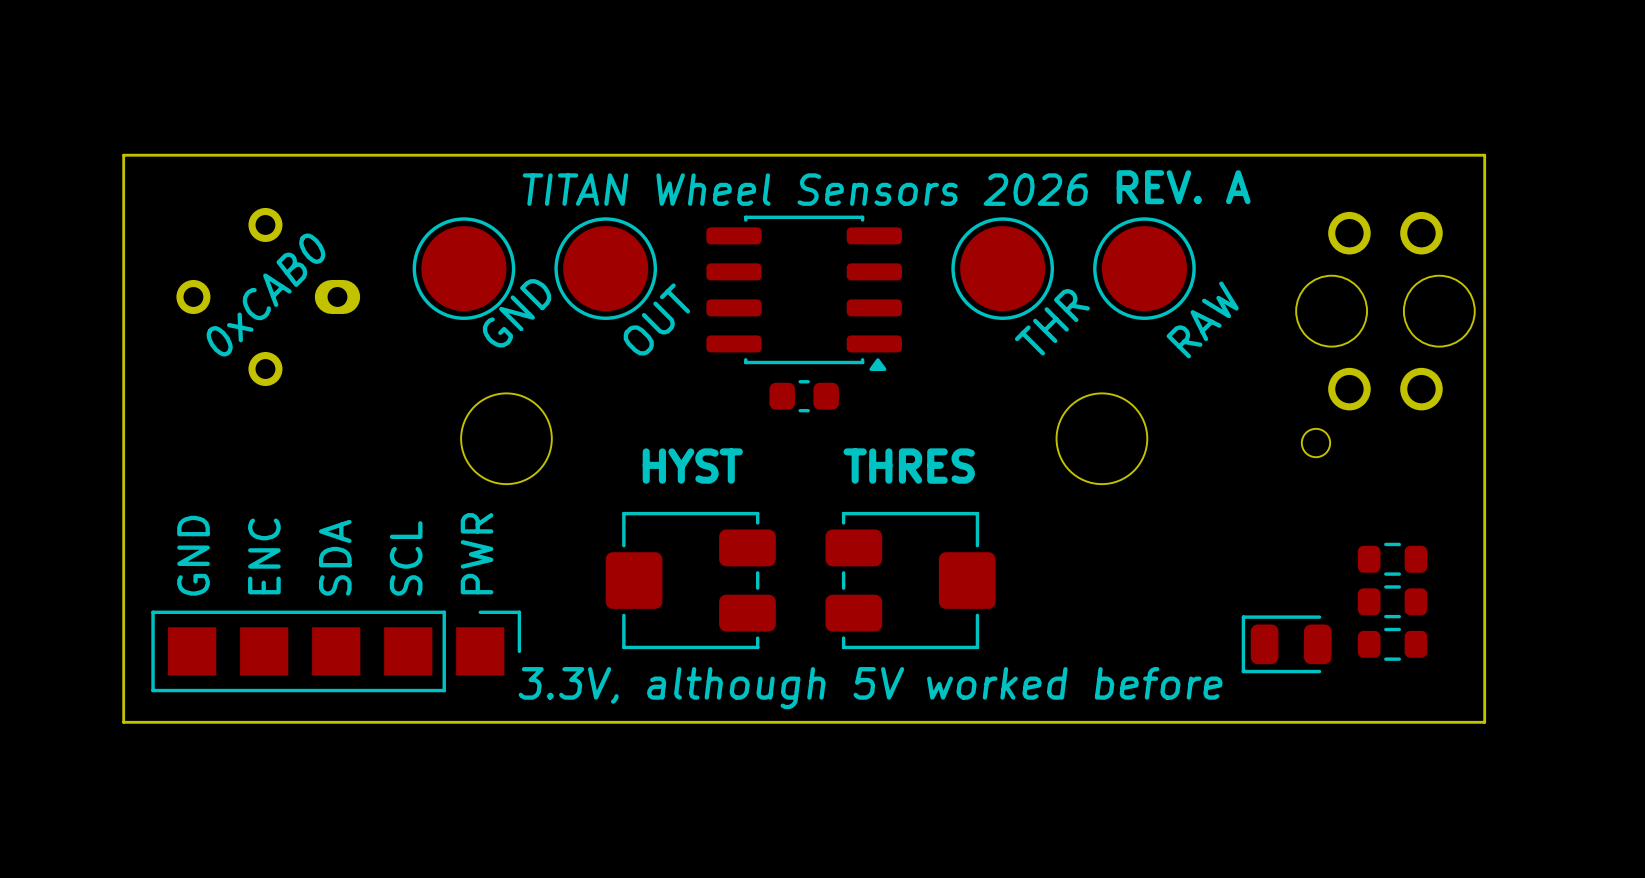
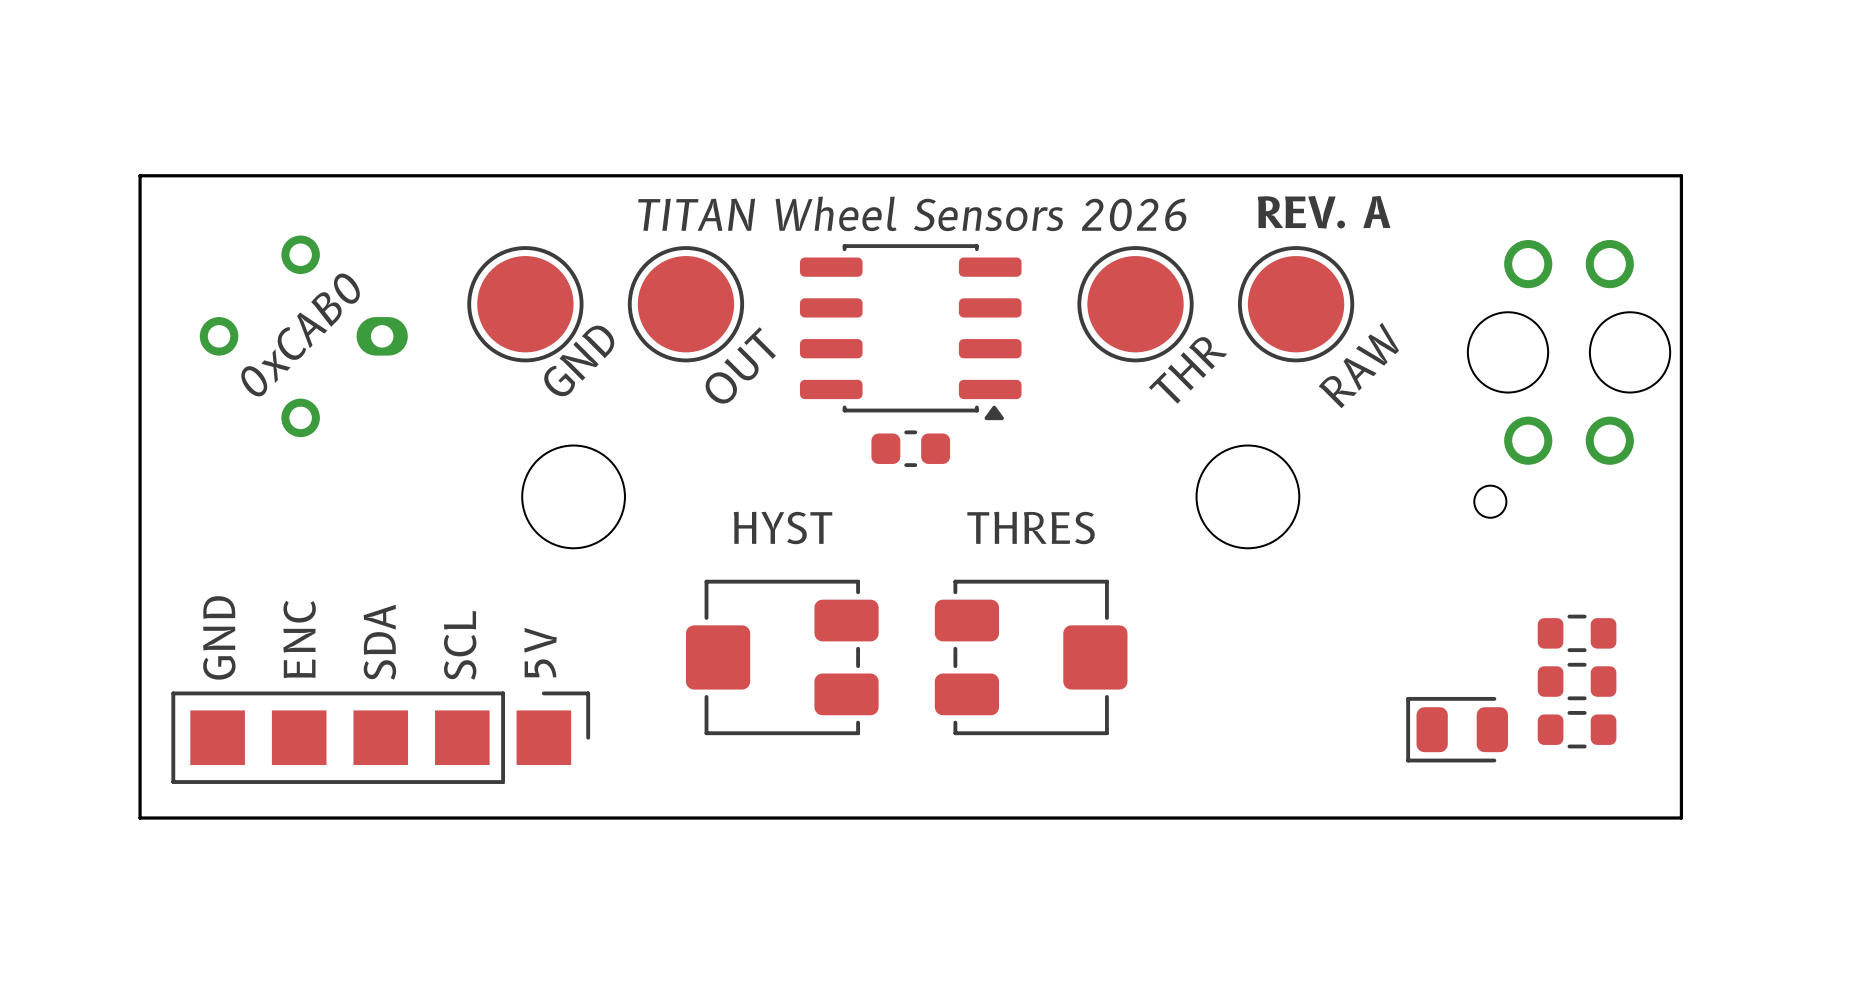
text: PWR (477, 553) -> 5V (540, 652)
text: 3.3V, although 5V worked before (870, 688) -> none

